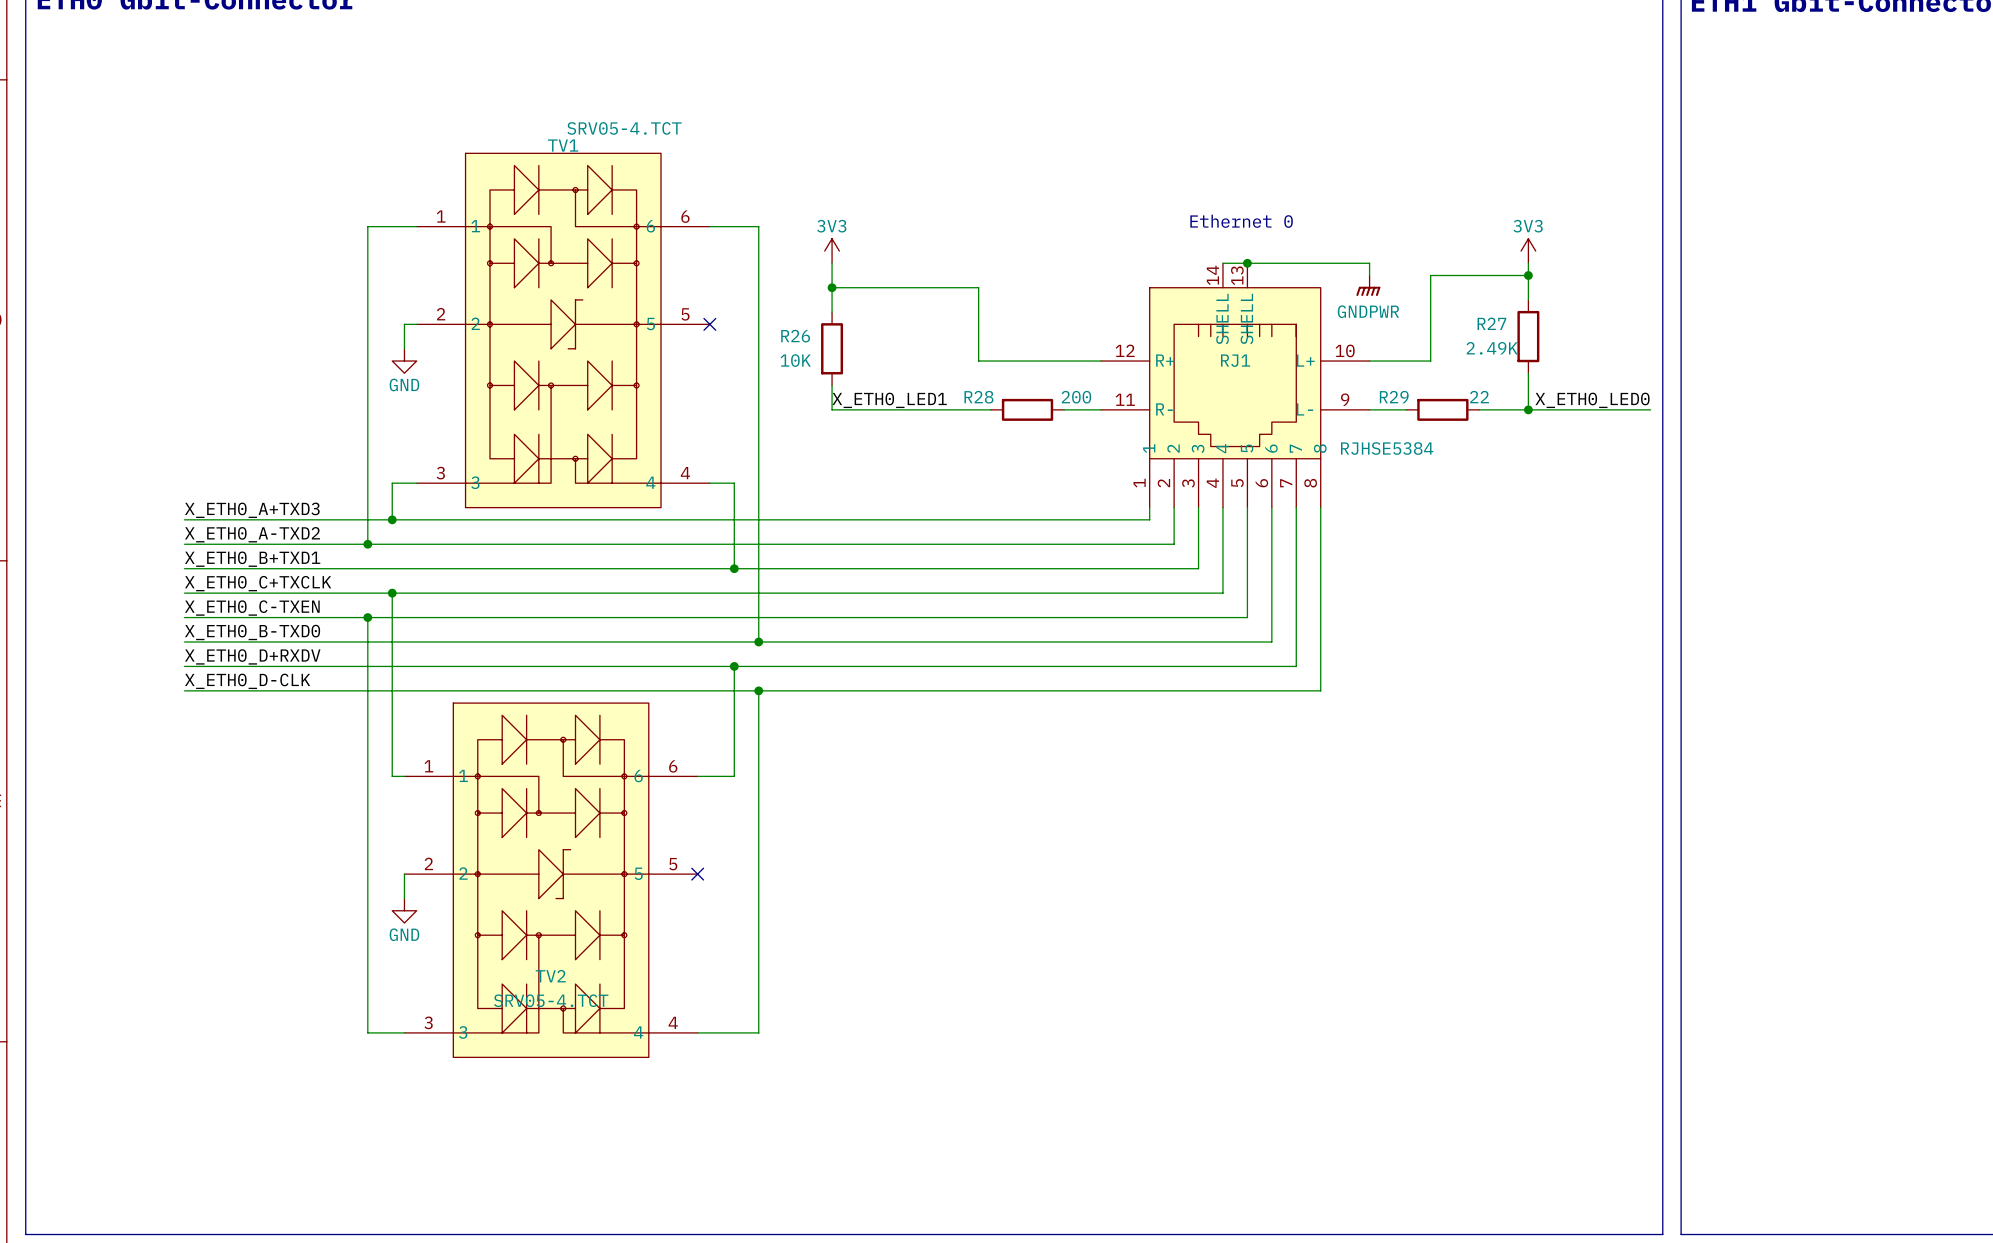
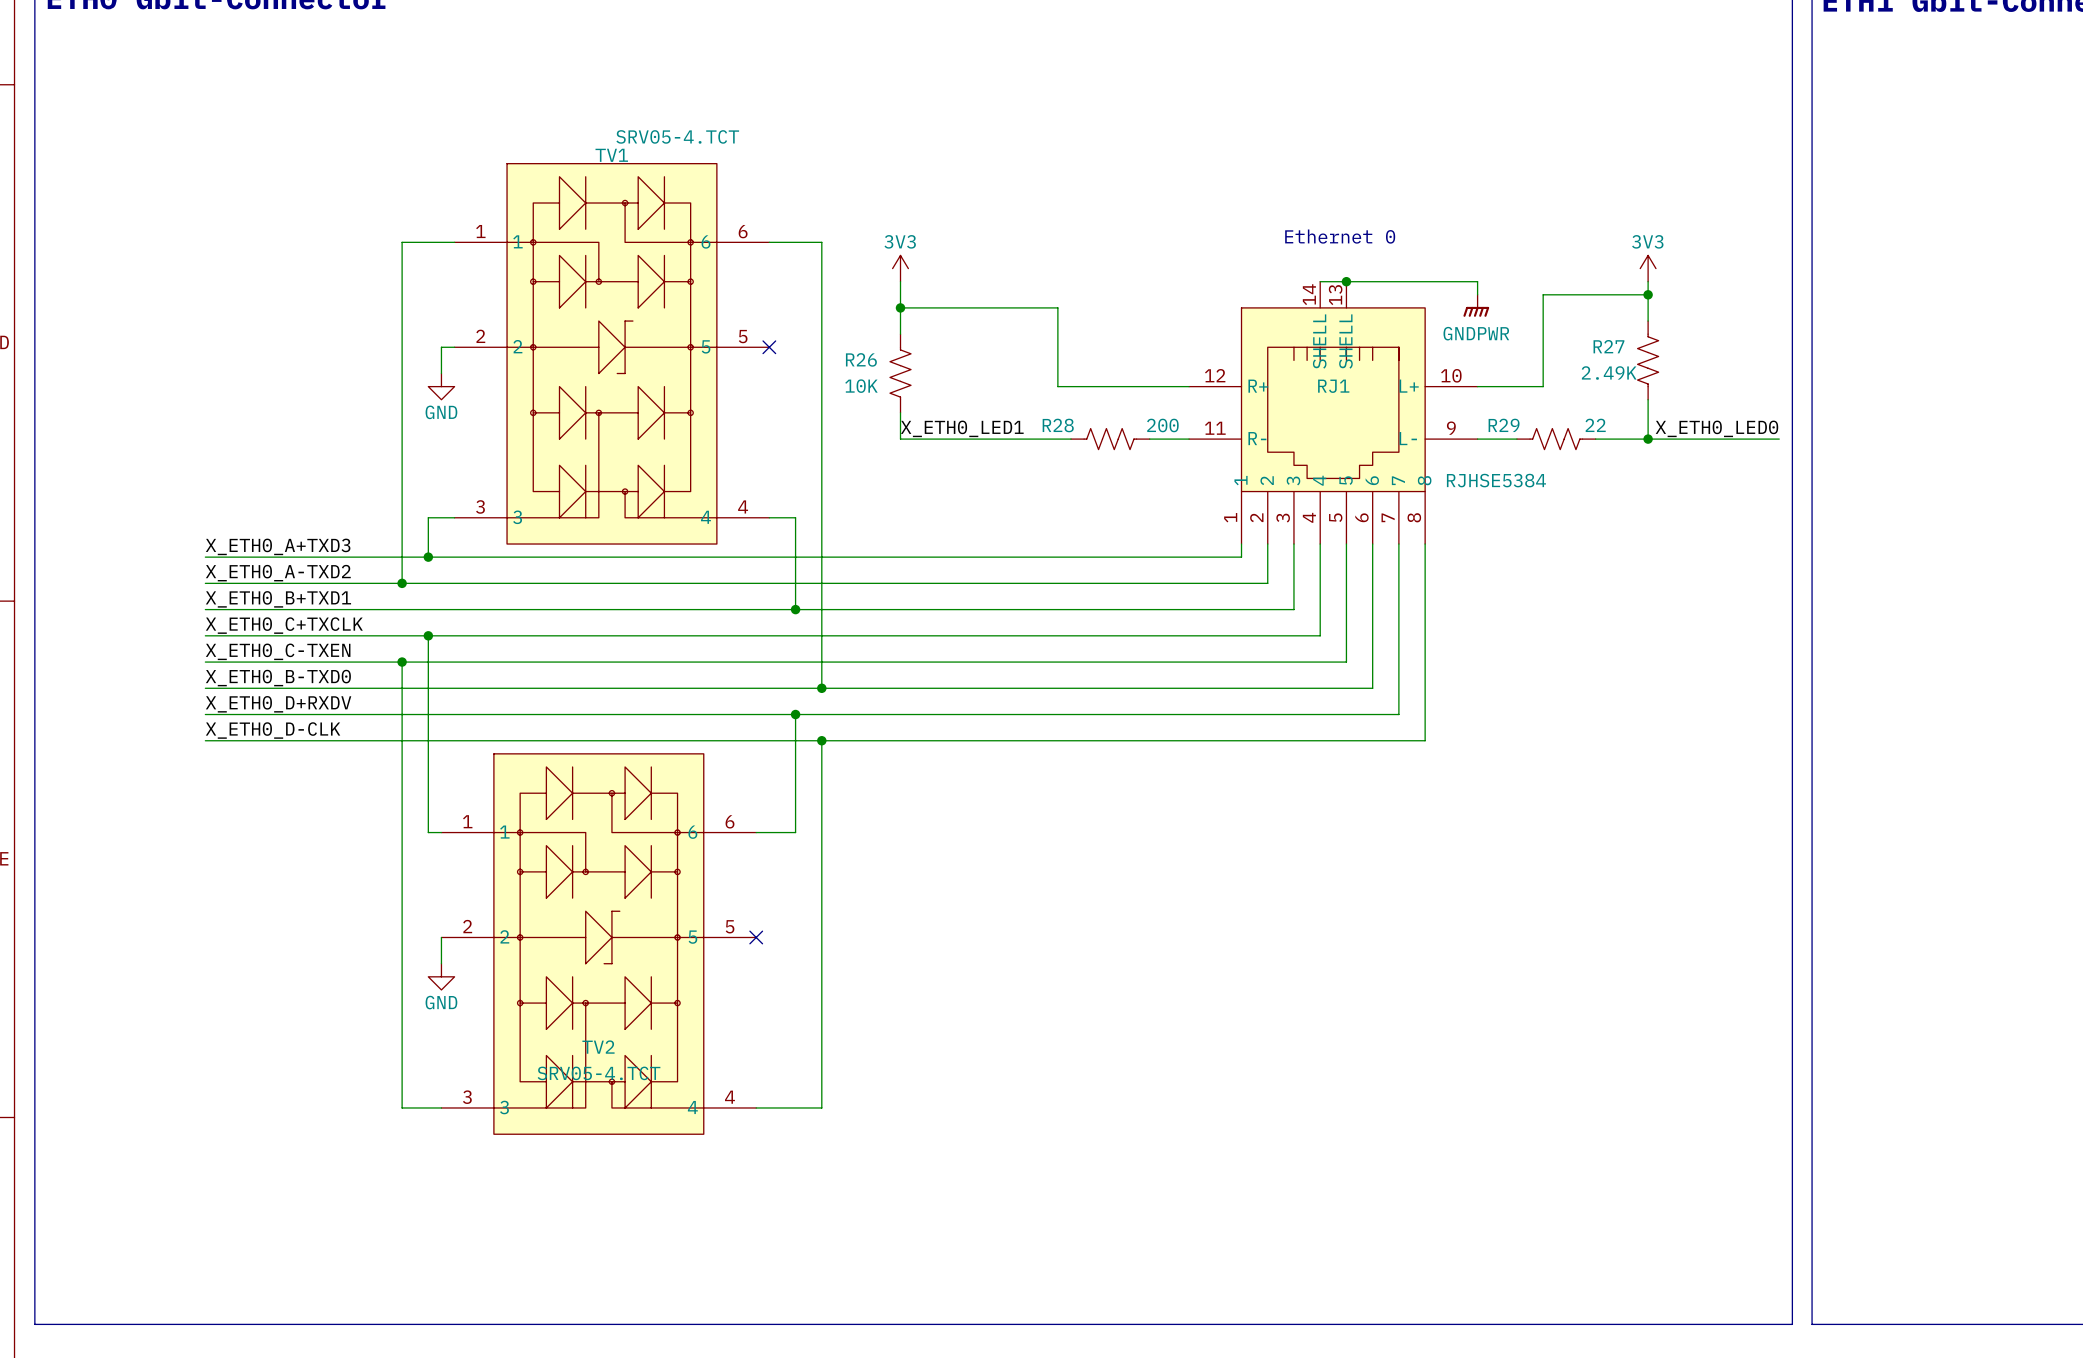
R27 symbol: [1517, 299, 1540, 374] -> [1637, 321, 1659, 400]
R26 symbol: [821, 312, 844, 386] -> [890, 334, 911, 413]
R28 symbol: [990, 398, 1065, 421] -> [1071, 428, 1150, 450]
R29 symbol: [1406, 398, 1480, 421] -> [1516, 428, 1596, 450]

